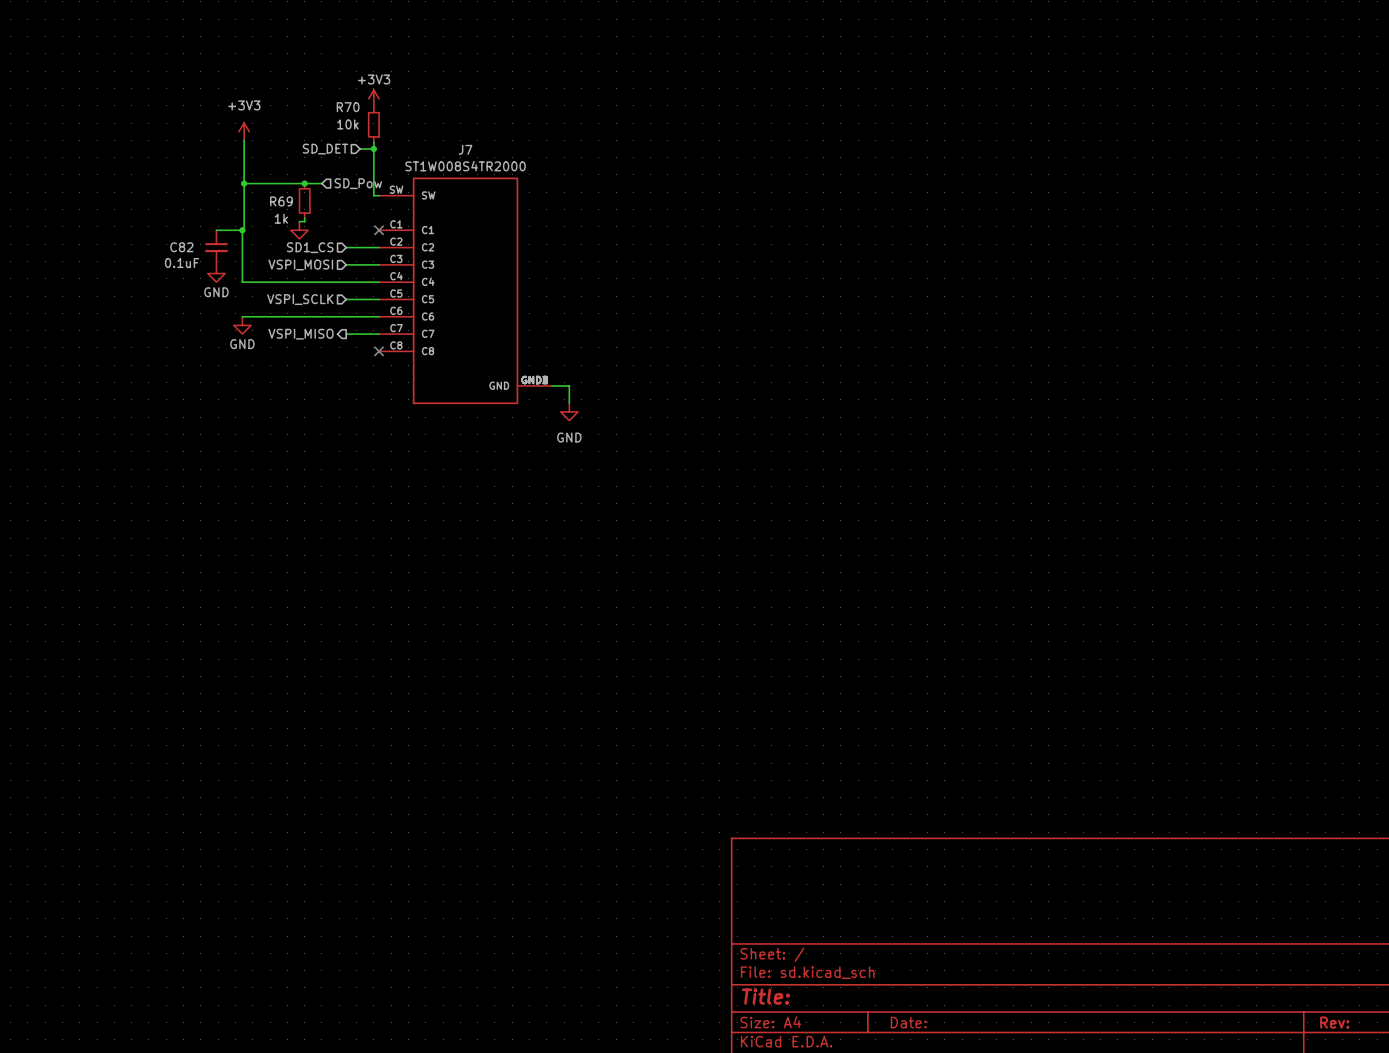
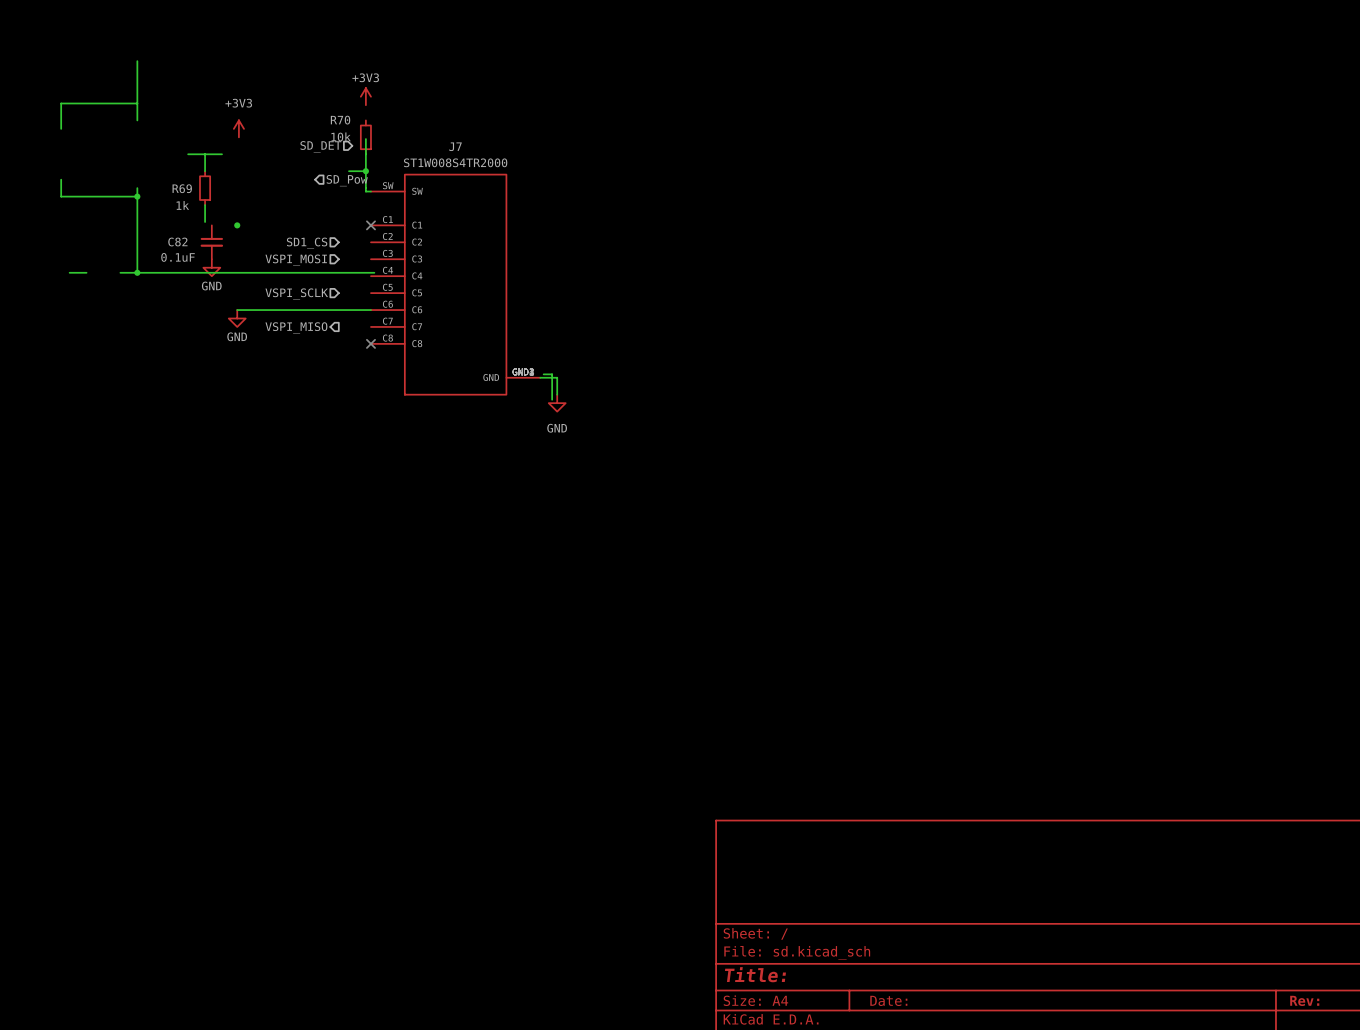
wire: none -> (137, 61) (137, 120)
wire: none -> (137, 103) (61, 103) (61, 128)
R70 position: (373, 124) -> (365, 137)
wire: (244, 140) (244, 230) (216, 230) -> none
wire: (360, 148) (373, 148) -> none
junction position: (373, 148) -> (365, 171)
wire: none -> (188, 154) (222, 154)
wire: none -> (205, 154) (205, 171)
wire: none -> (348, 171) (365, 171)
wire: none -> (61, 179) (61, 196) (137, 196)
wire: (244, 183) (321, 183) -> none
junction: (244, 183) -> none
junction: (304, 183) -> none
wire: none -> (137, 188) (137, 272)
junction: none -> (137, 196)
R69 position: (304, 200) -> (205, 188)
wire: none -> (205, 205) (205, 222)
wire: (304, 218) (304, 221) (299, 221) -> none
wire: (242, 230) (242, 282) (379, 282) -> none
power symbol: (299, 230) -> none
wire: (346, 247) (379, 247) -> none
wire: (346, 264) (379, 264) -> none
wire: none -> (69, 272) (86, 272)
wire: none -> (120, 272) (374, 272)
junction: none -> (137, 272)
wire: (346, 299) (379, 299) -> none
wire: (346, 334) (379, 334) -> none
wire: none -> (543, 374) (552, 374) (552, 399)

